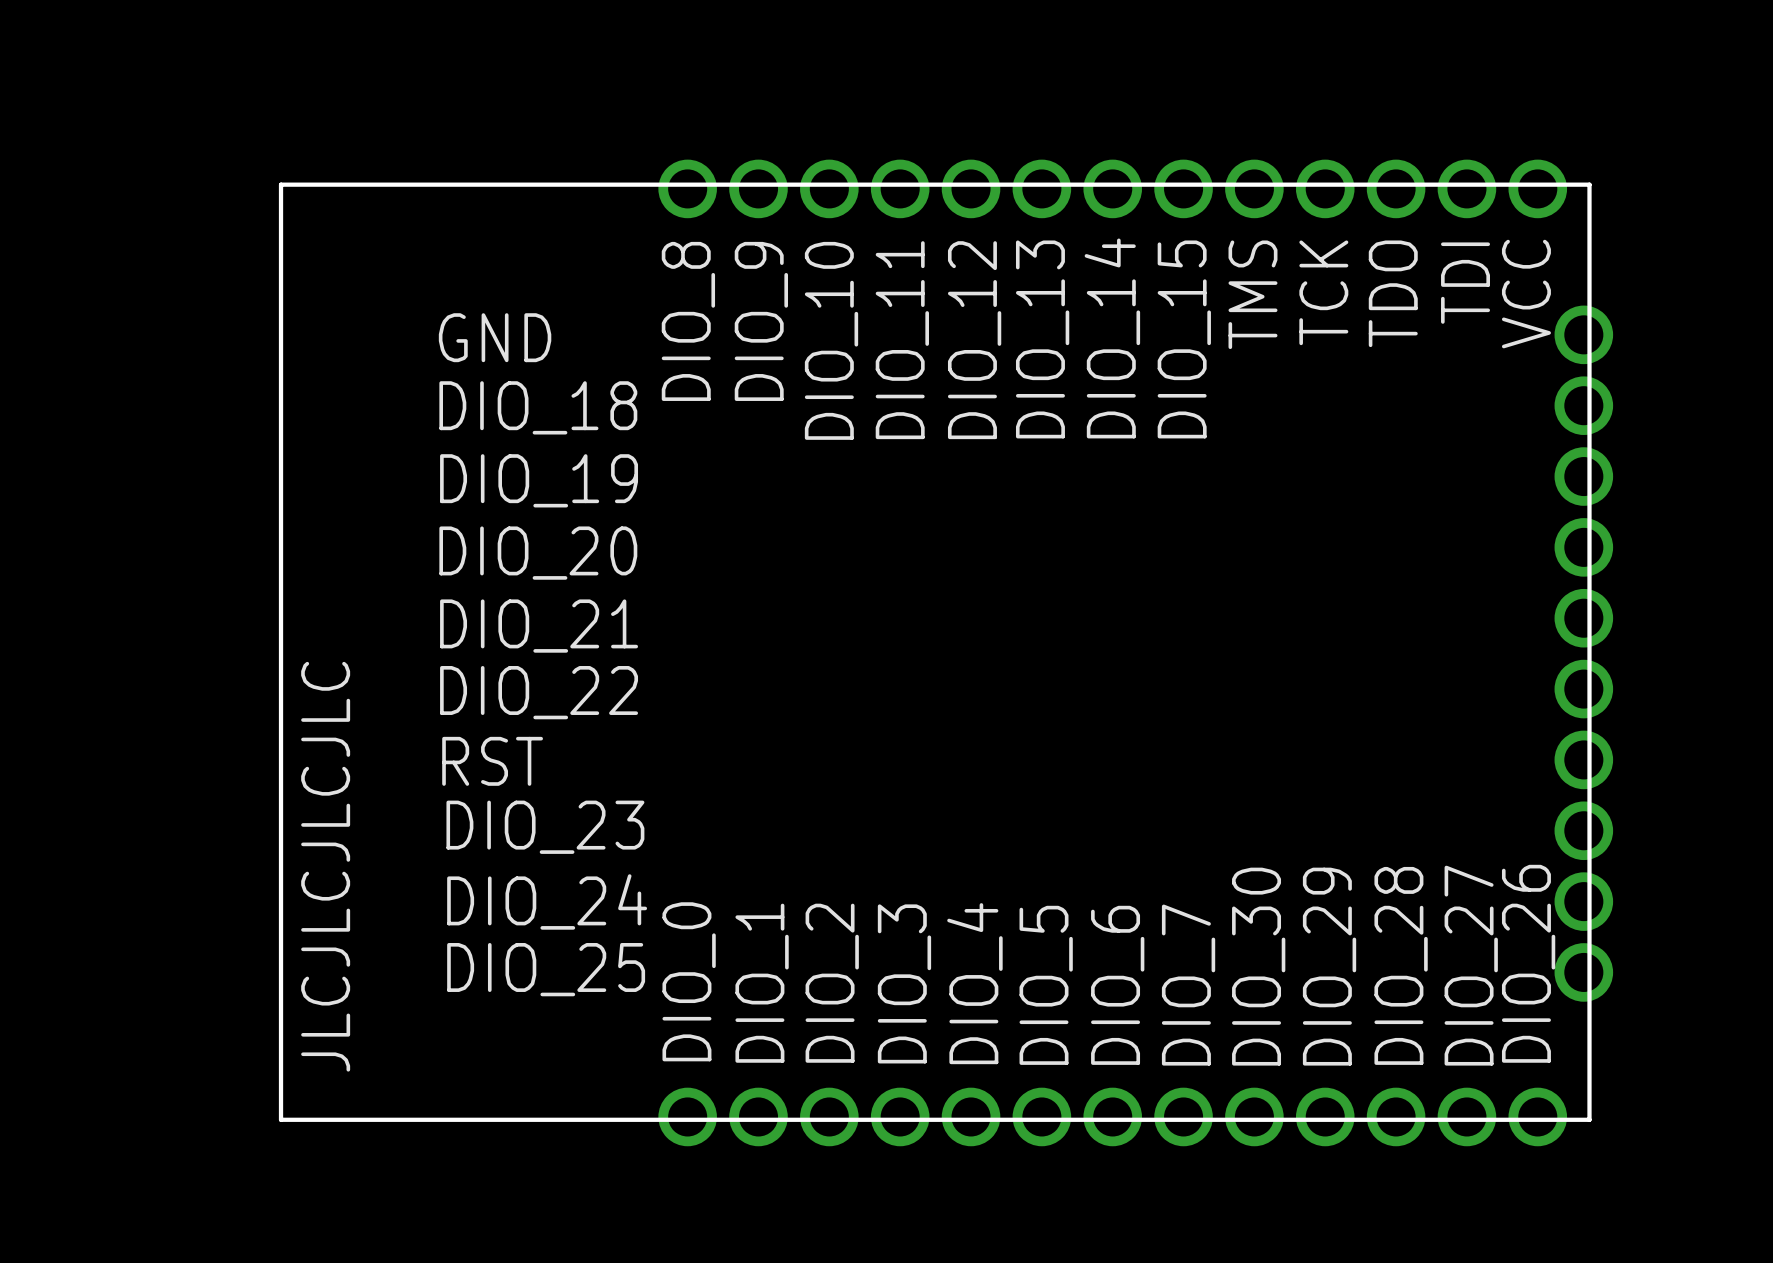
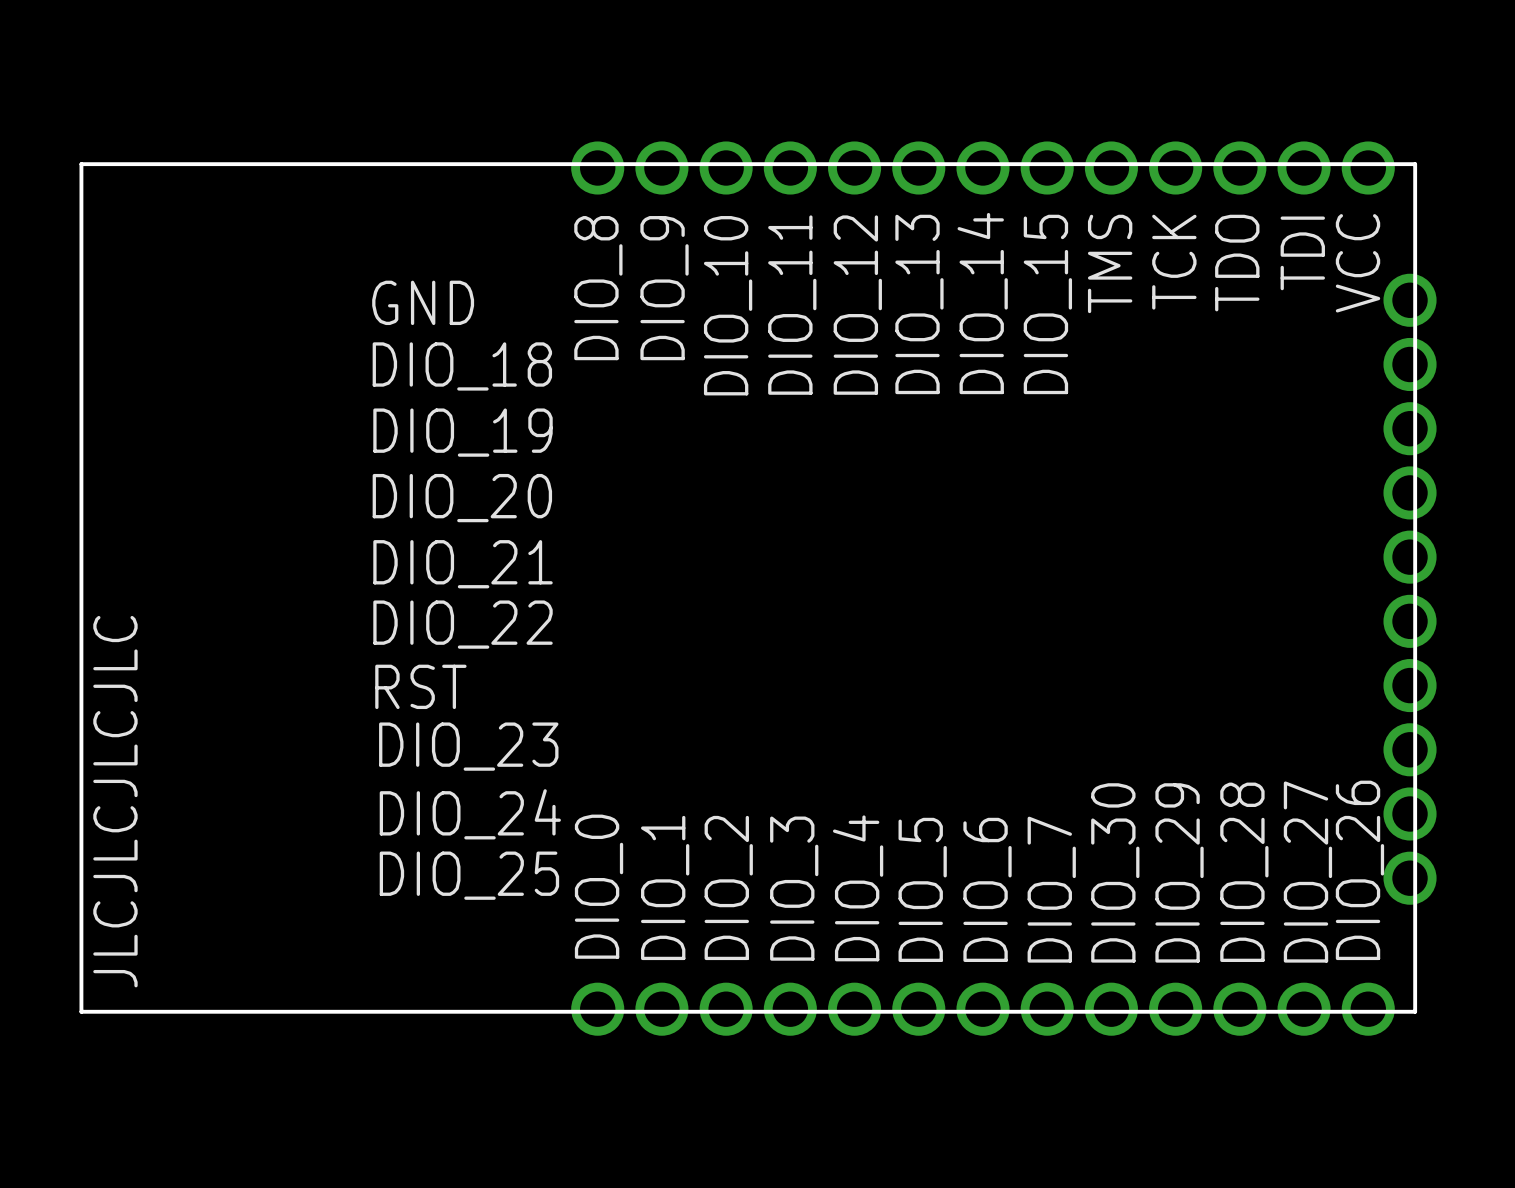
board edge: (281, 184) (281, 1119) -> (229, 164) (81, 164) (81, 1011) (229, 1011)
text position: JLCJLCJLCJLC (325, 866) -> JLCJLCJLCJLC (115, 801)

